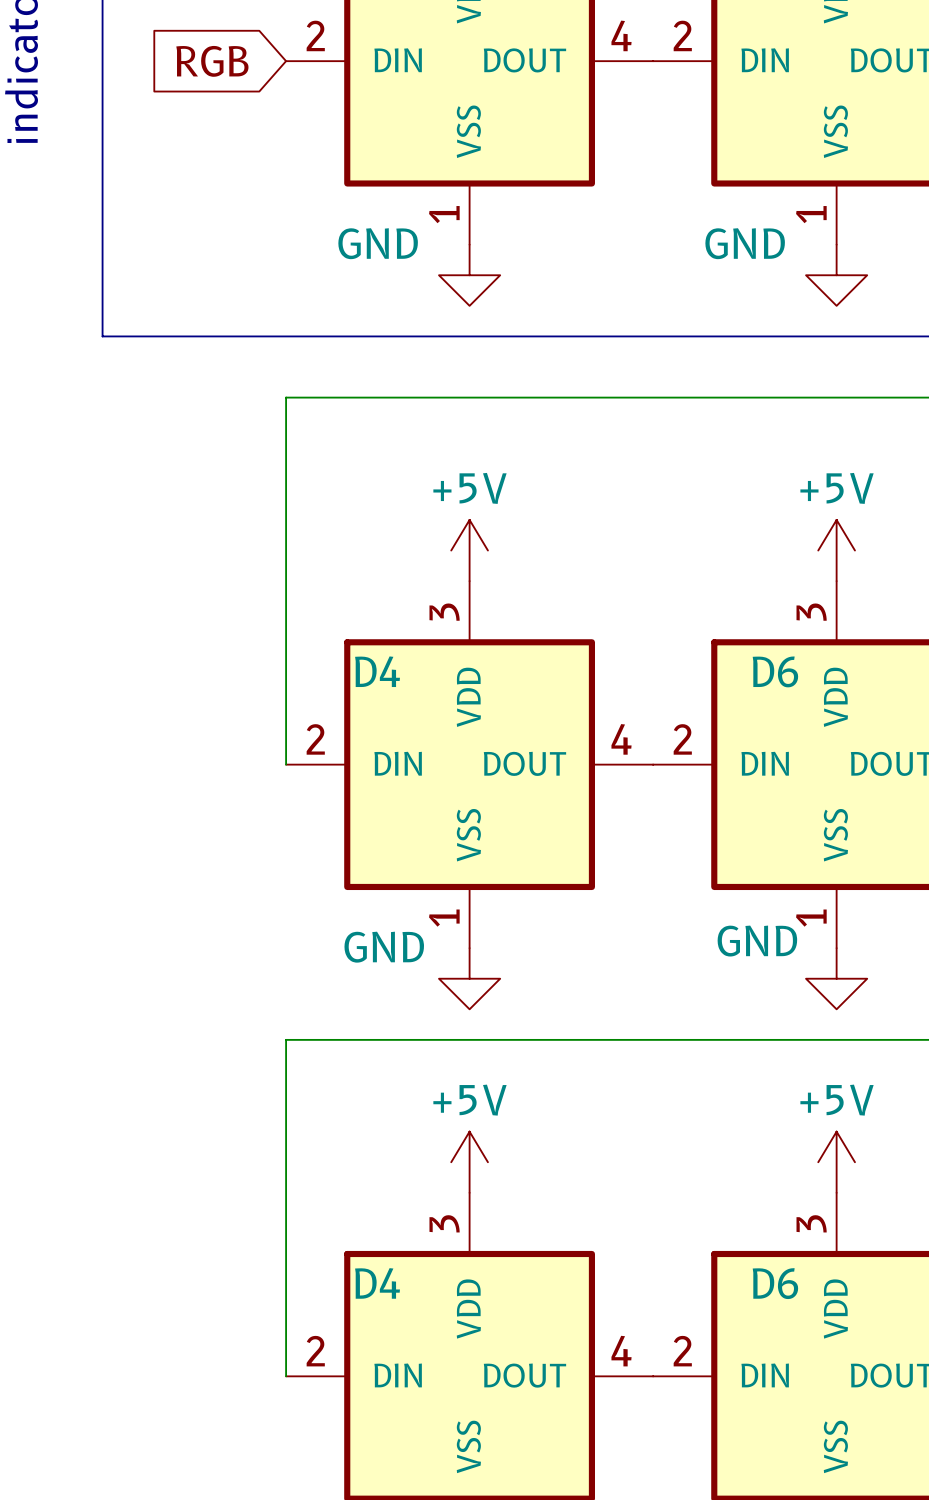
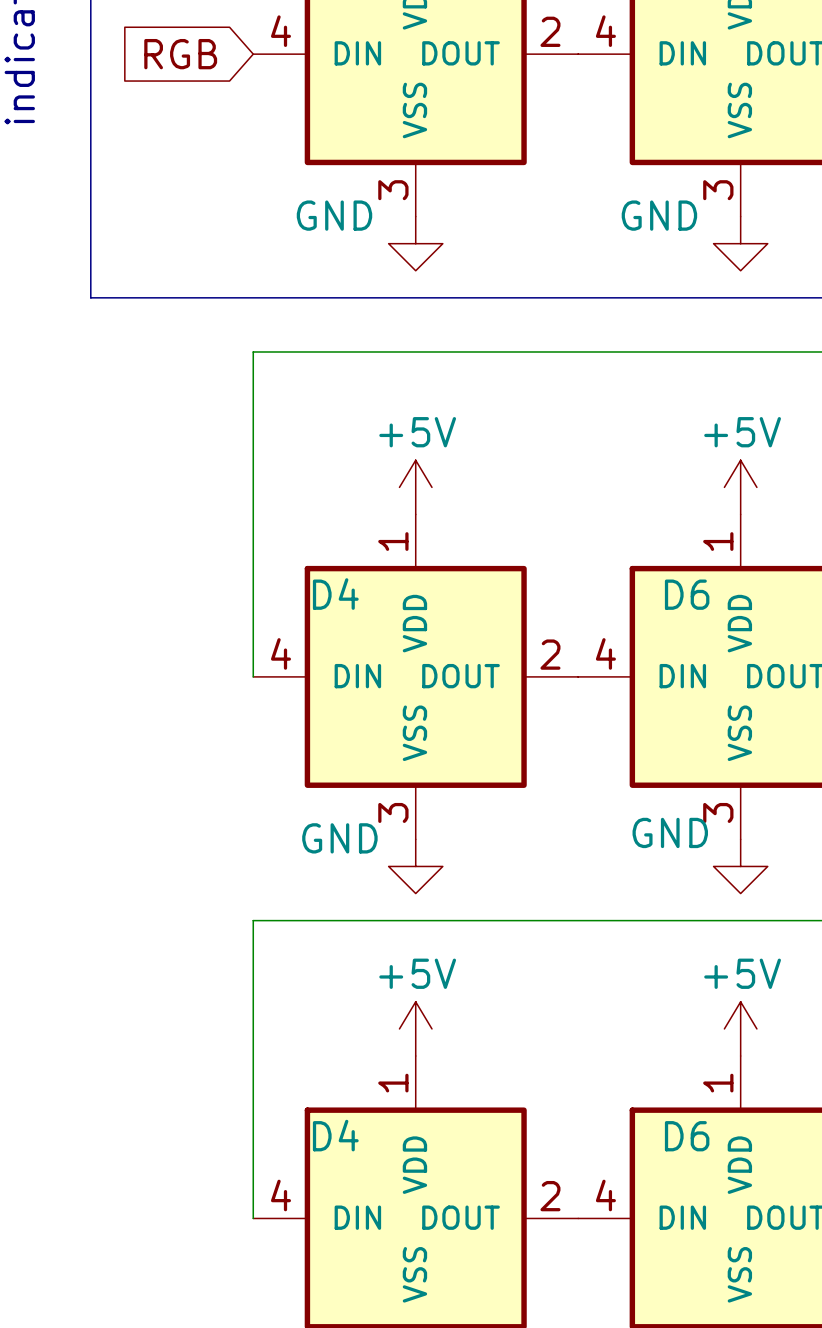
part pin number: 2 (315, 35) -> 4 (280, 31)
part pin number: 4 (621, 35) -> 2 (550, 31)
part pin number: 2 (682, 35) -> 4 (605, 31)
part pin number: 1 (444, 214) -> 3 (393, 190)
part pin number: 1 (811, 214) -> 3 (718, 190)
D4 pin number: 3 (444, 612) -> 1 (393, 541)
D6 pin number: 3 (811, 612) -> 1 (718, 541)
D4 pin number: 2 (315, 739) -> 4 (280, 653)
D4 pin number: 4 (621, 739) -> 2 (550, 654)
D6 pin number: 2 (682, 739) -> 4 (605, 653)
D4 pin number: 1 (444, 918) -> 3 (393, 812)
D6 pin number: 1 (811, 918) -> 3 (718, 812)
D4 pin number: 3 (444, 1223) -> 1 (393, 1083)
D6 pin number: 3 (811, 1223) -> 1 (718, 1083)
D4 pin number: 2 (315, 1351) -> 4 (280, 1195)
D4 pin number: 4 (621, 1351) -> 2 (550, 1196)
D6 pin number: 2 (682, 1351) -> 4 (605, 1195)

